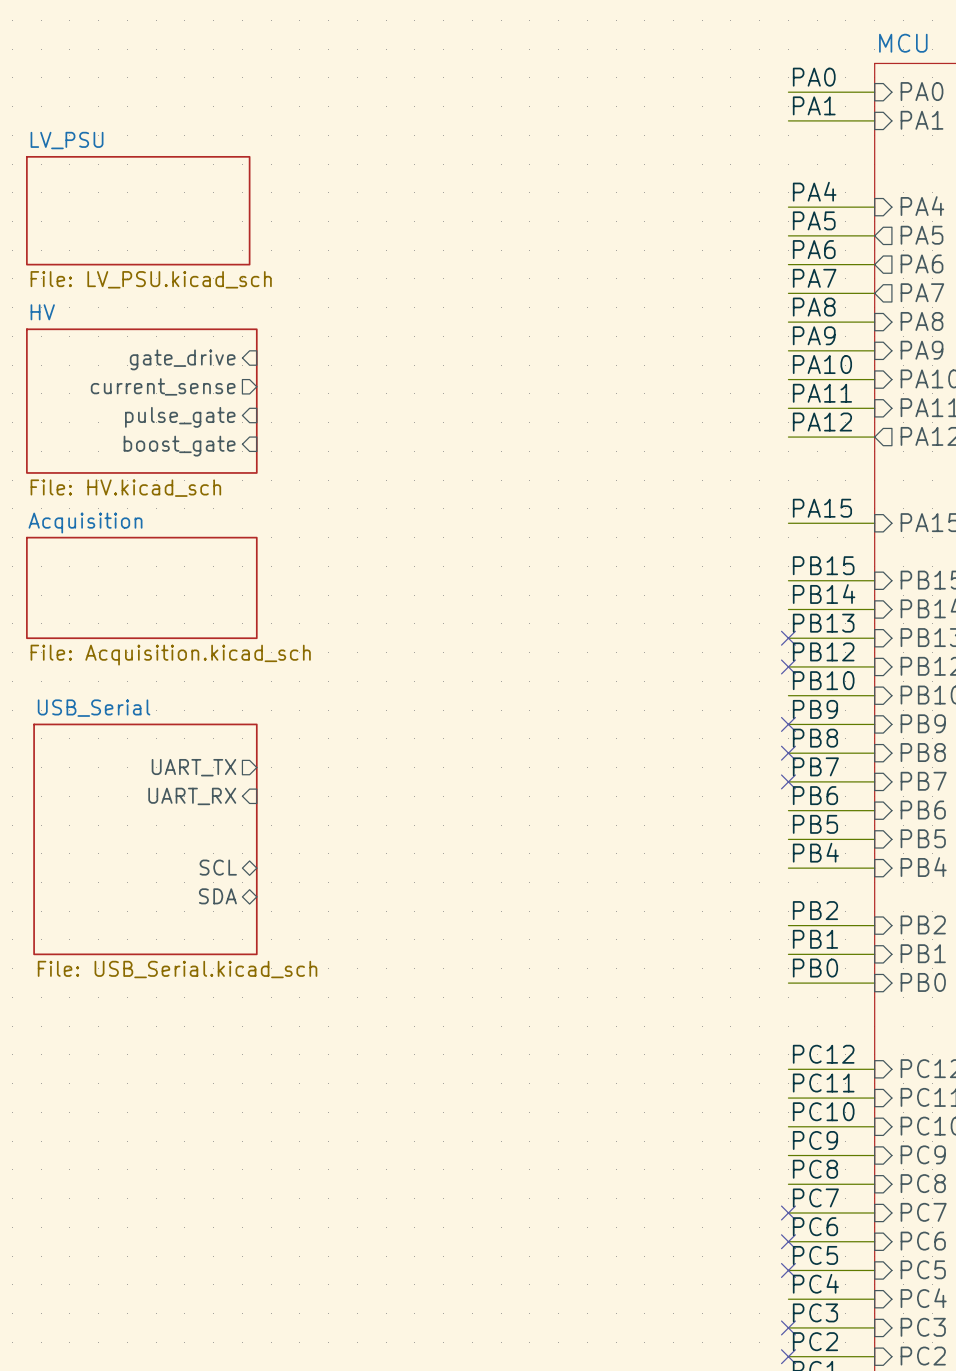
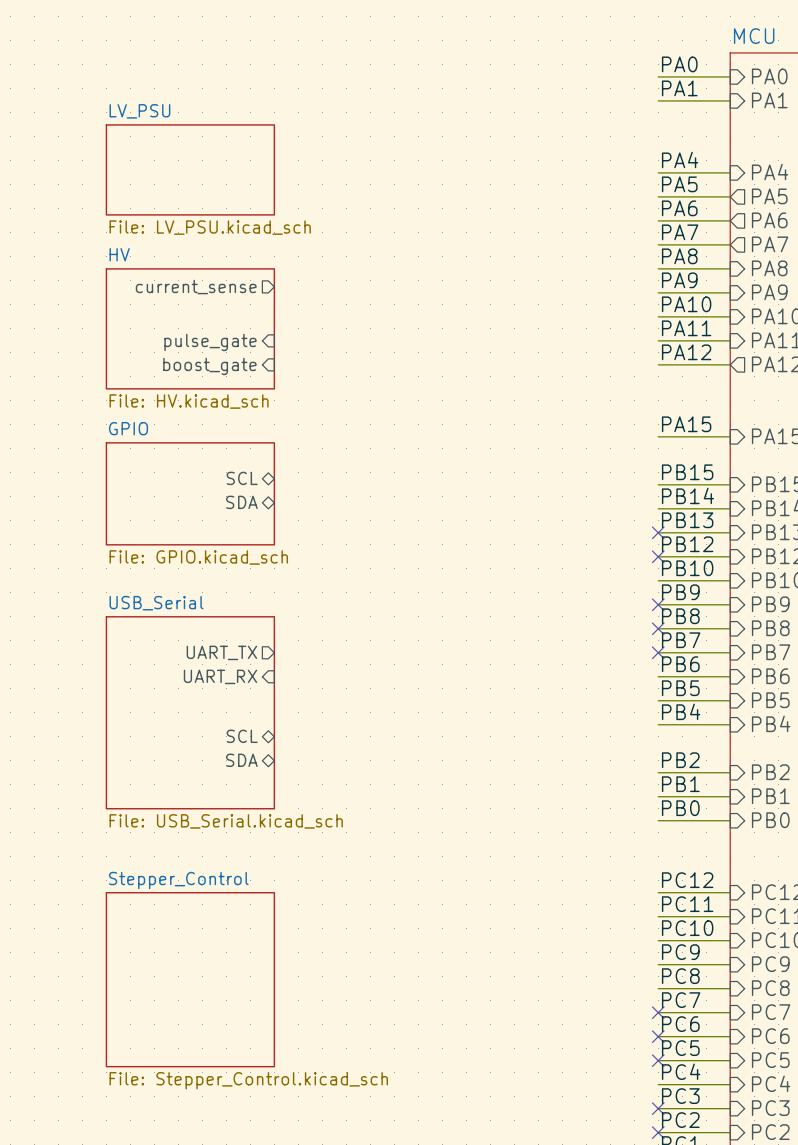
sheet LV_PSU: none -> File: LV_PSU.kicad_sch (190, 169)
sheet LV_PSU: File: LV_PSU.kicad_sch (138, 210) -> none
sheet pin: gate_drive (182, 359) -> none
sheet pin position: current_sense (163, 386) -> current_sense (196, 287)
sheet HV: none -> File: HV.kicad_sch (190, 328)
sheet HV: File: HV.kicad_sch (141, 401) -> none
sheet pin position: pulse_gate (180, 417) -> pulse_gate (210, 342)
sheet pin position: boost_gate (179, 446) -> boost_gate (209, 366)
sheet pin: none -> SCL (242, 478)
sheet Acquisition: File: Acquisition.kicad_sch (141, 587) -> none
sheet GPIO: none -> File: GPIO.kicad_sch (190, 493)
sheet pin: none -> SDA (241, 502)
sheet pin position: UART_TX (193, 767) -> UART_TX (221, 652)
sheet pin position: UART_RX (192, 796) -> UART_RX (220, 676)
sheet USB_Serial: File: USB_Serial.kicad_sch (145, 839) -> none
sheet USB_Serial: none -> File: USB_Serial.kicad_sch (190, 712)
sheet pin position: SCL (218, 867) -> SCL (242, 736)
sheet pin position: SDA (217, 896) -> SDA (241, 760)
sheet Stepper_Control: none -> File: Stepper_Control.kicad_sch (190, 979)

